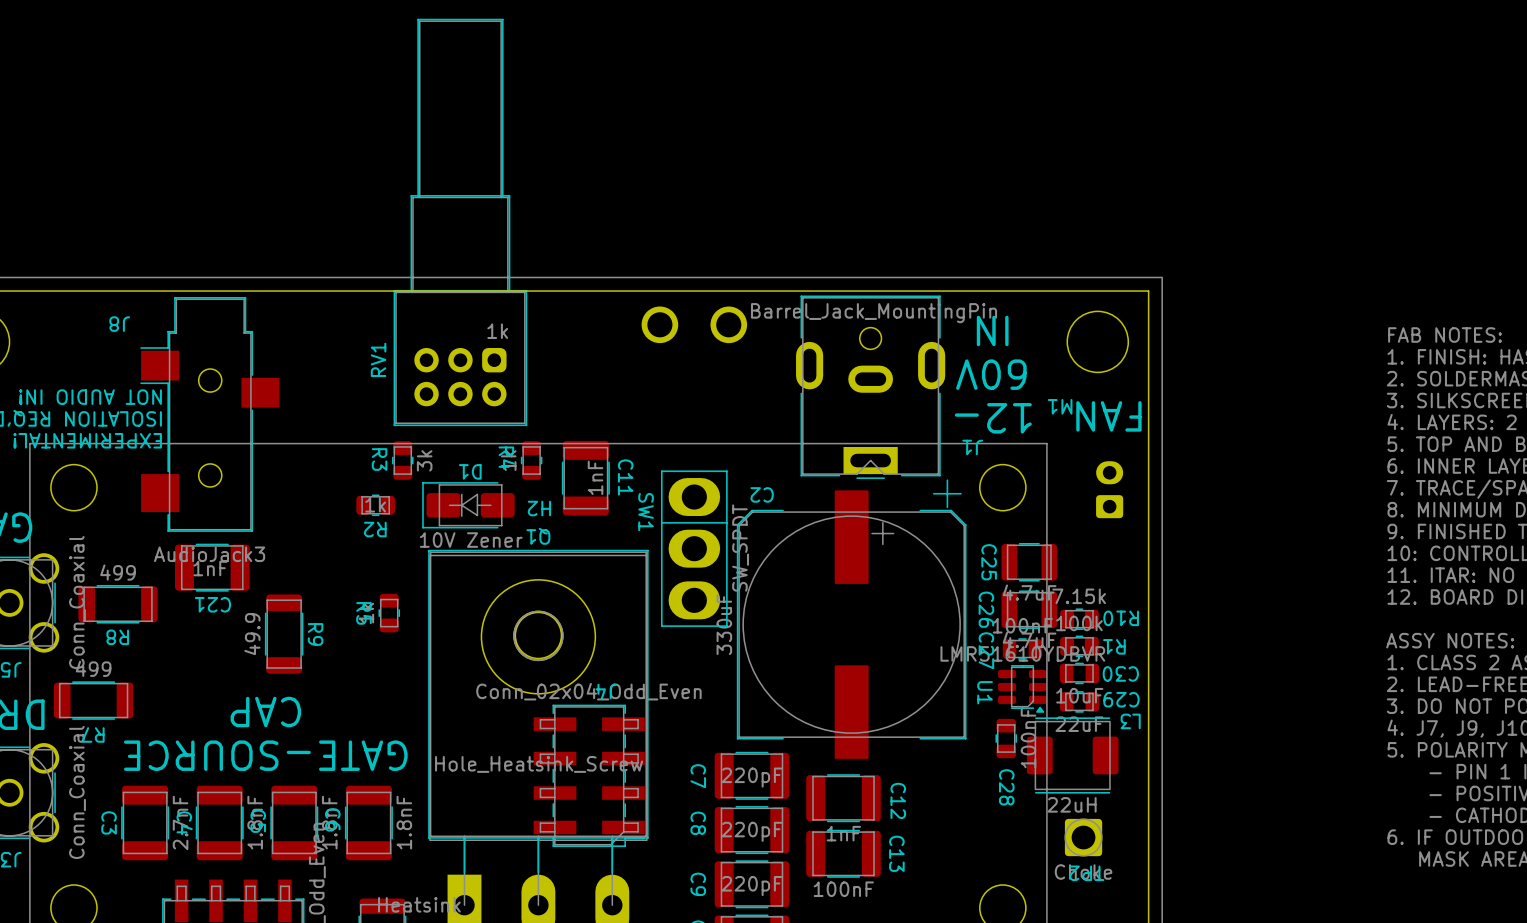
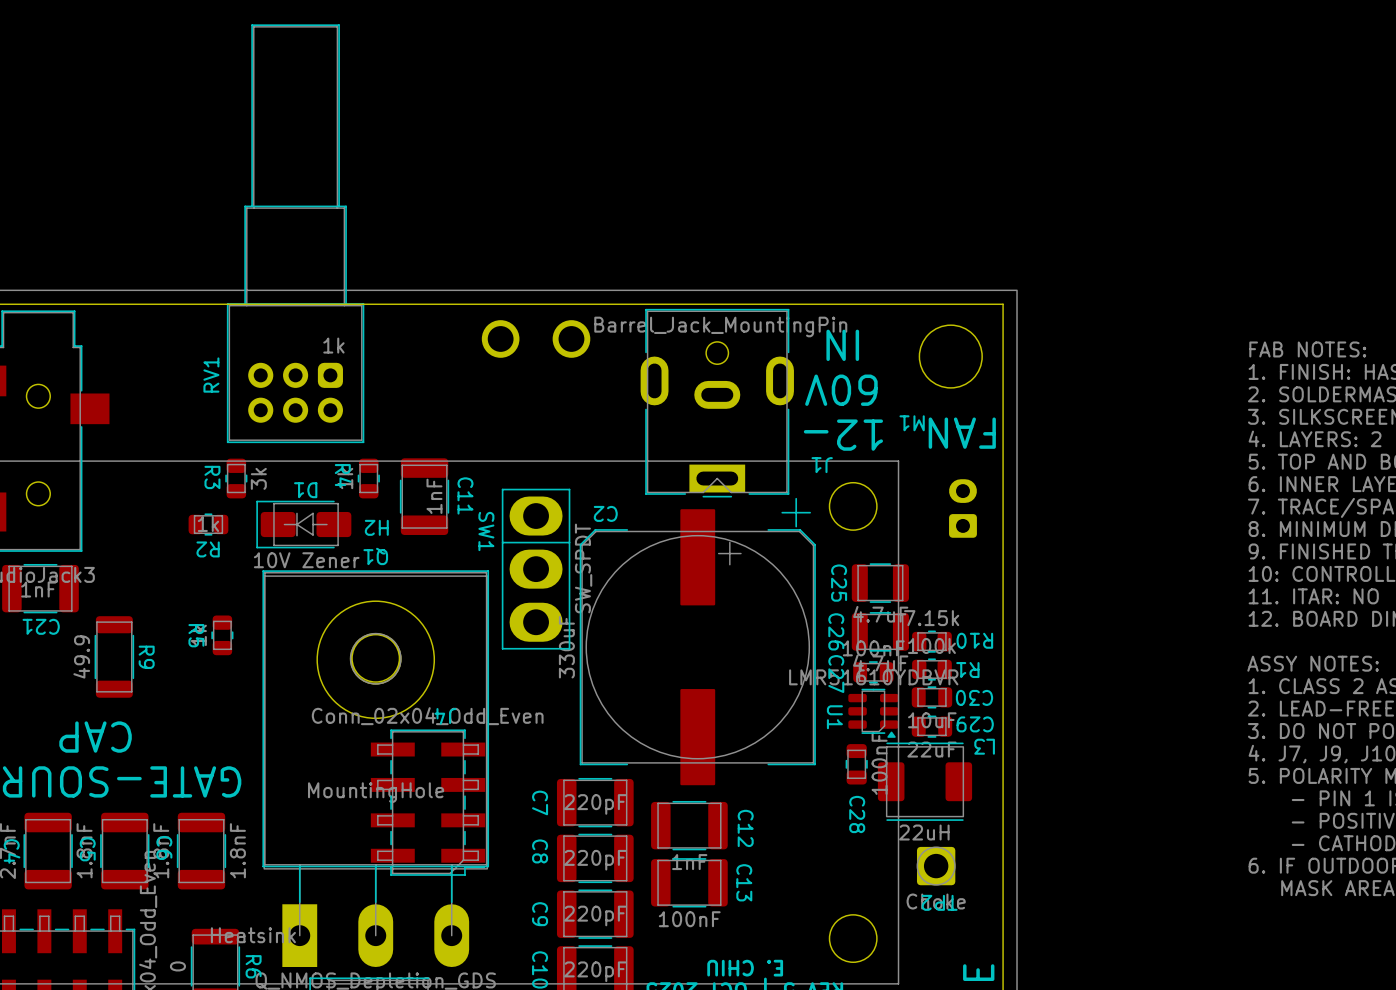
H2 value: Hole_Heatsink_Screw (539, 764) -> MountingHole (376, 792)

